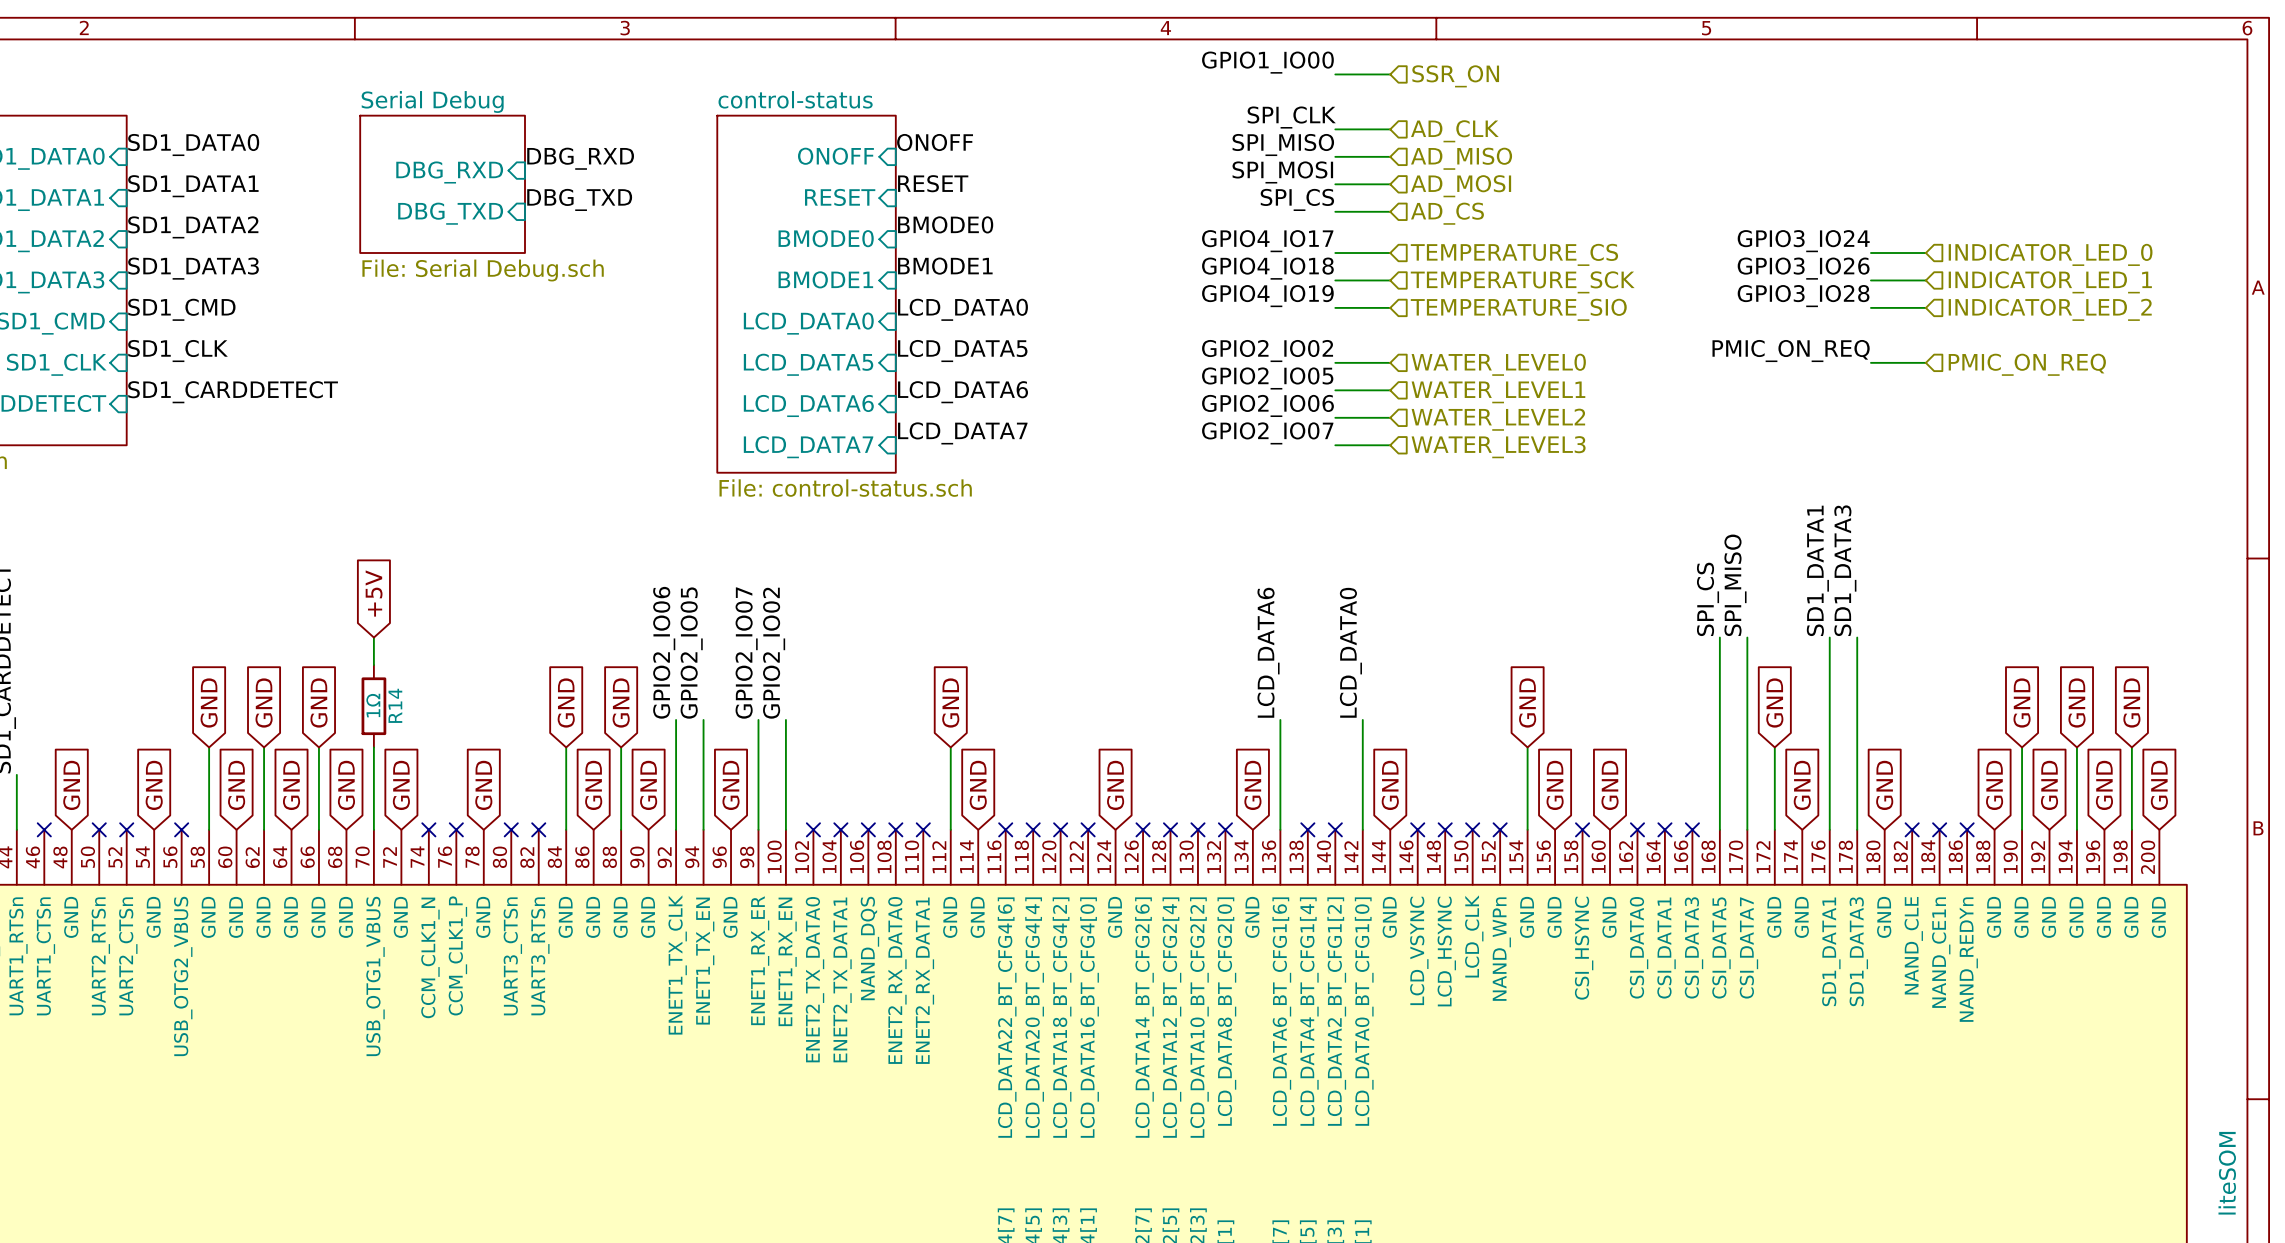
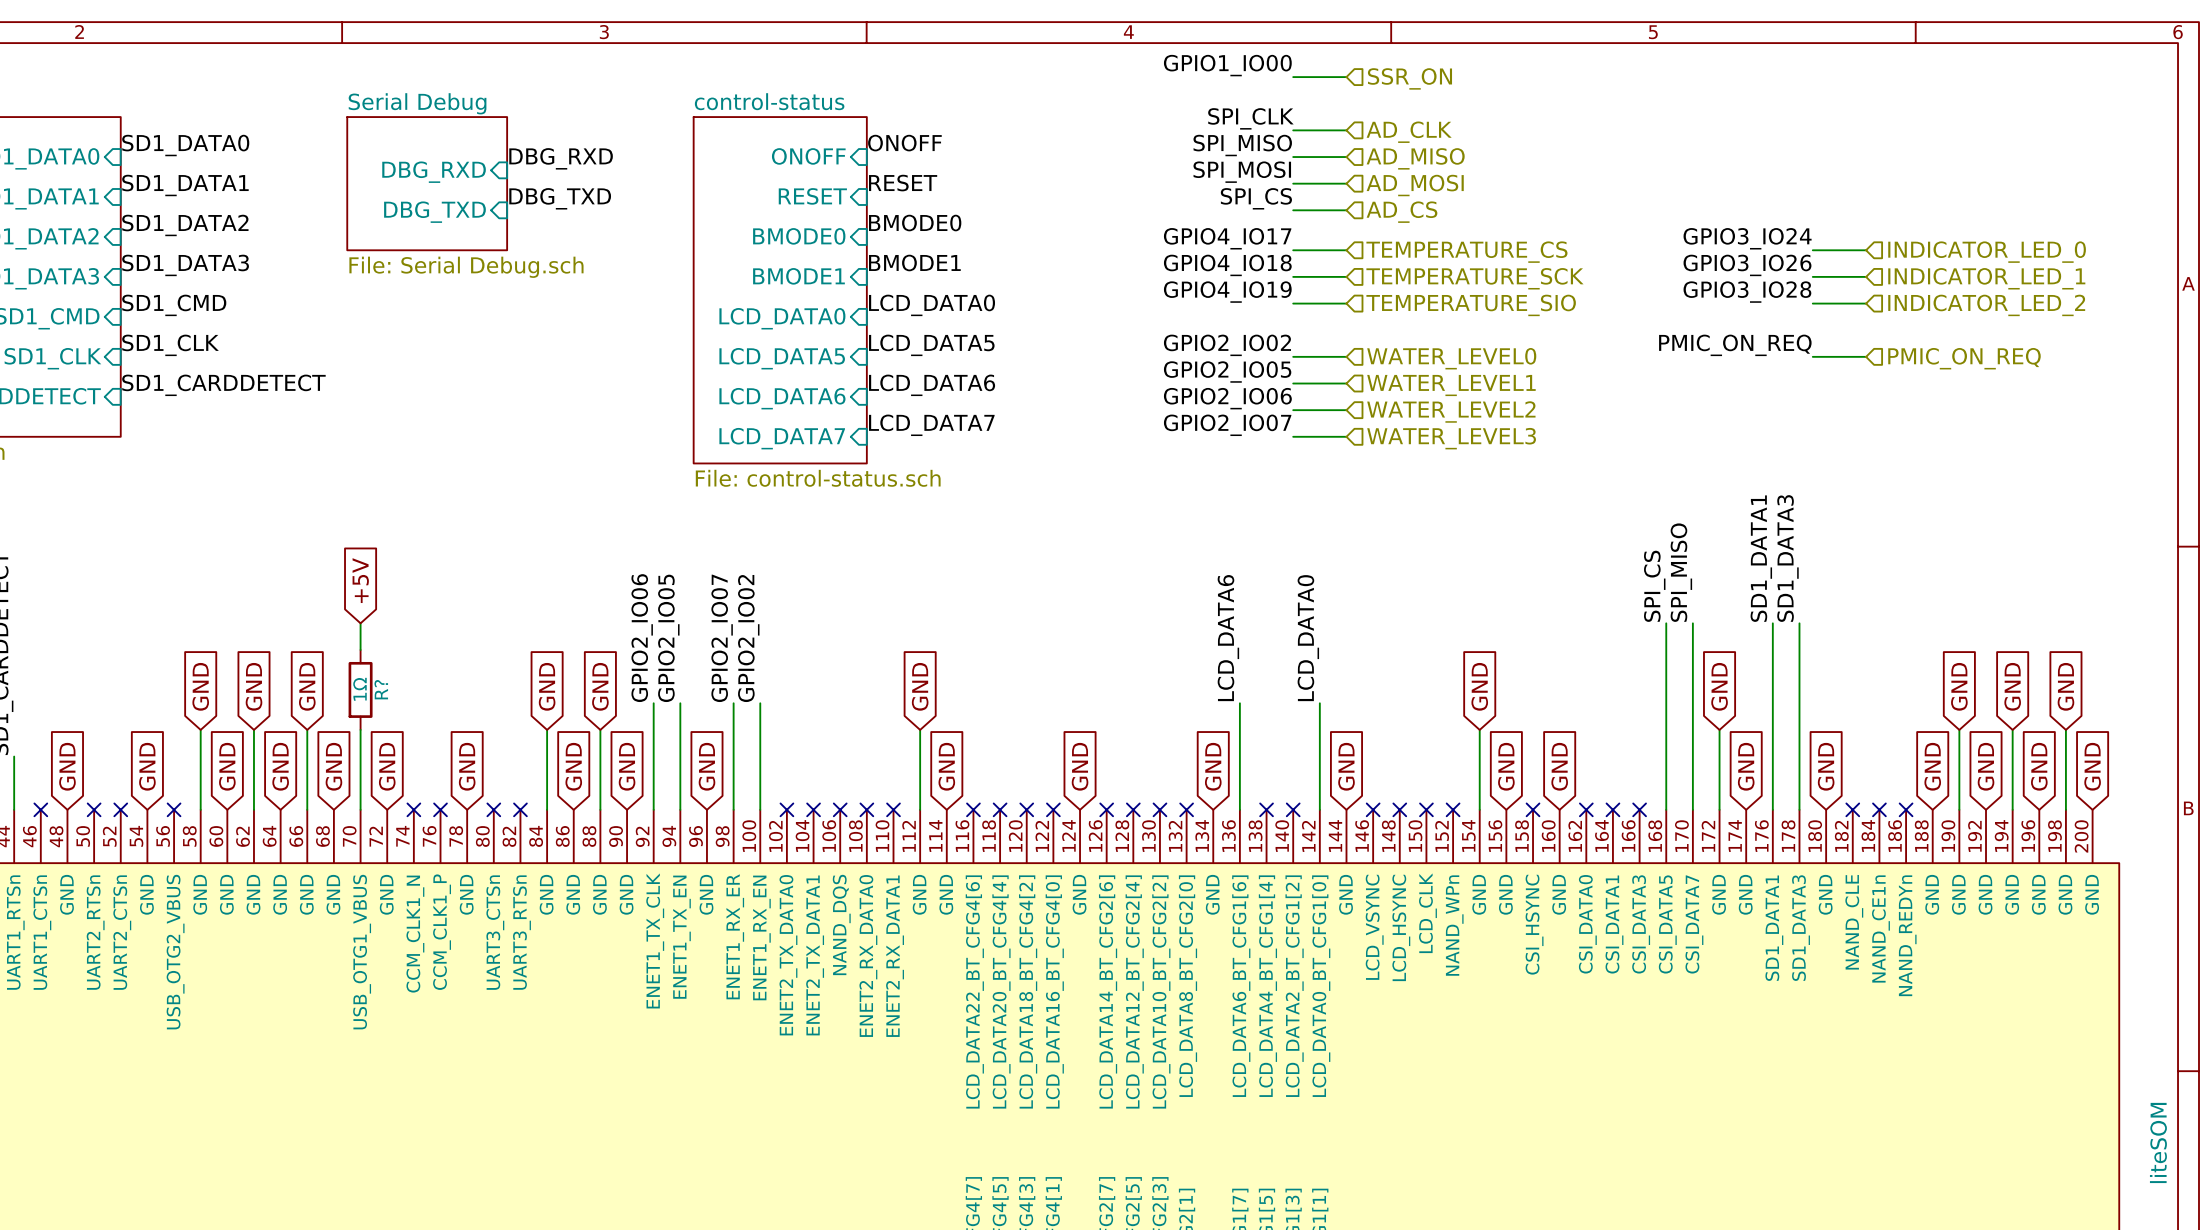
R14 name: R14 (395, 705) -> R? (381, 689)

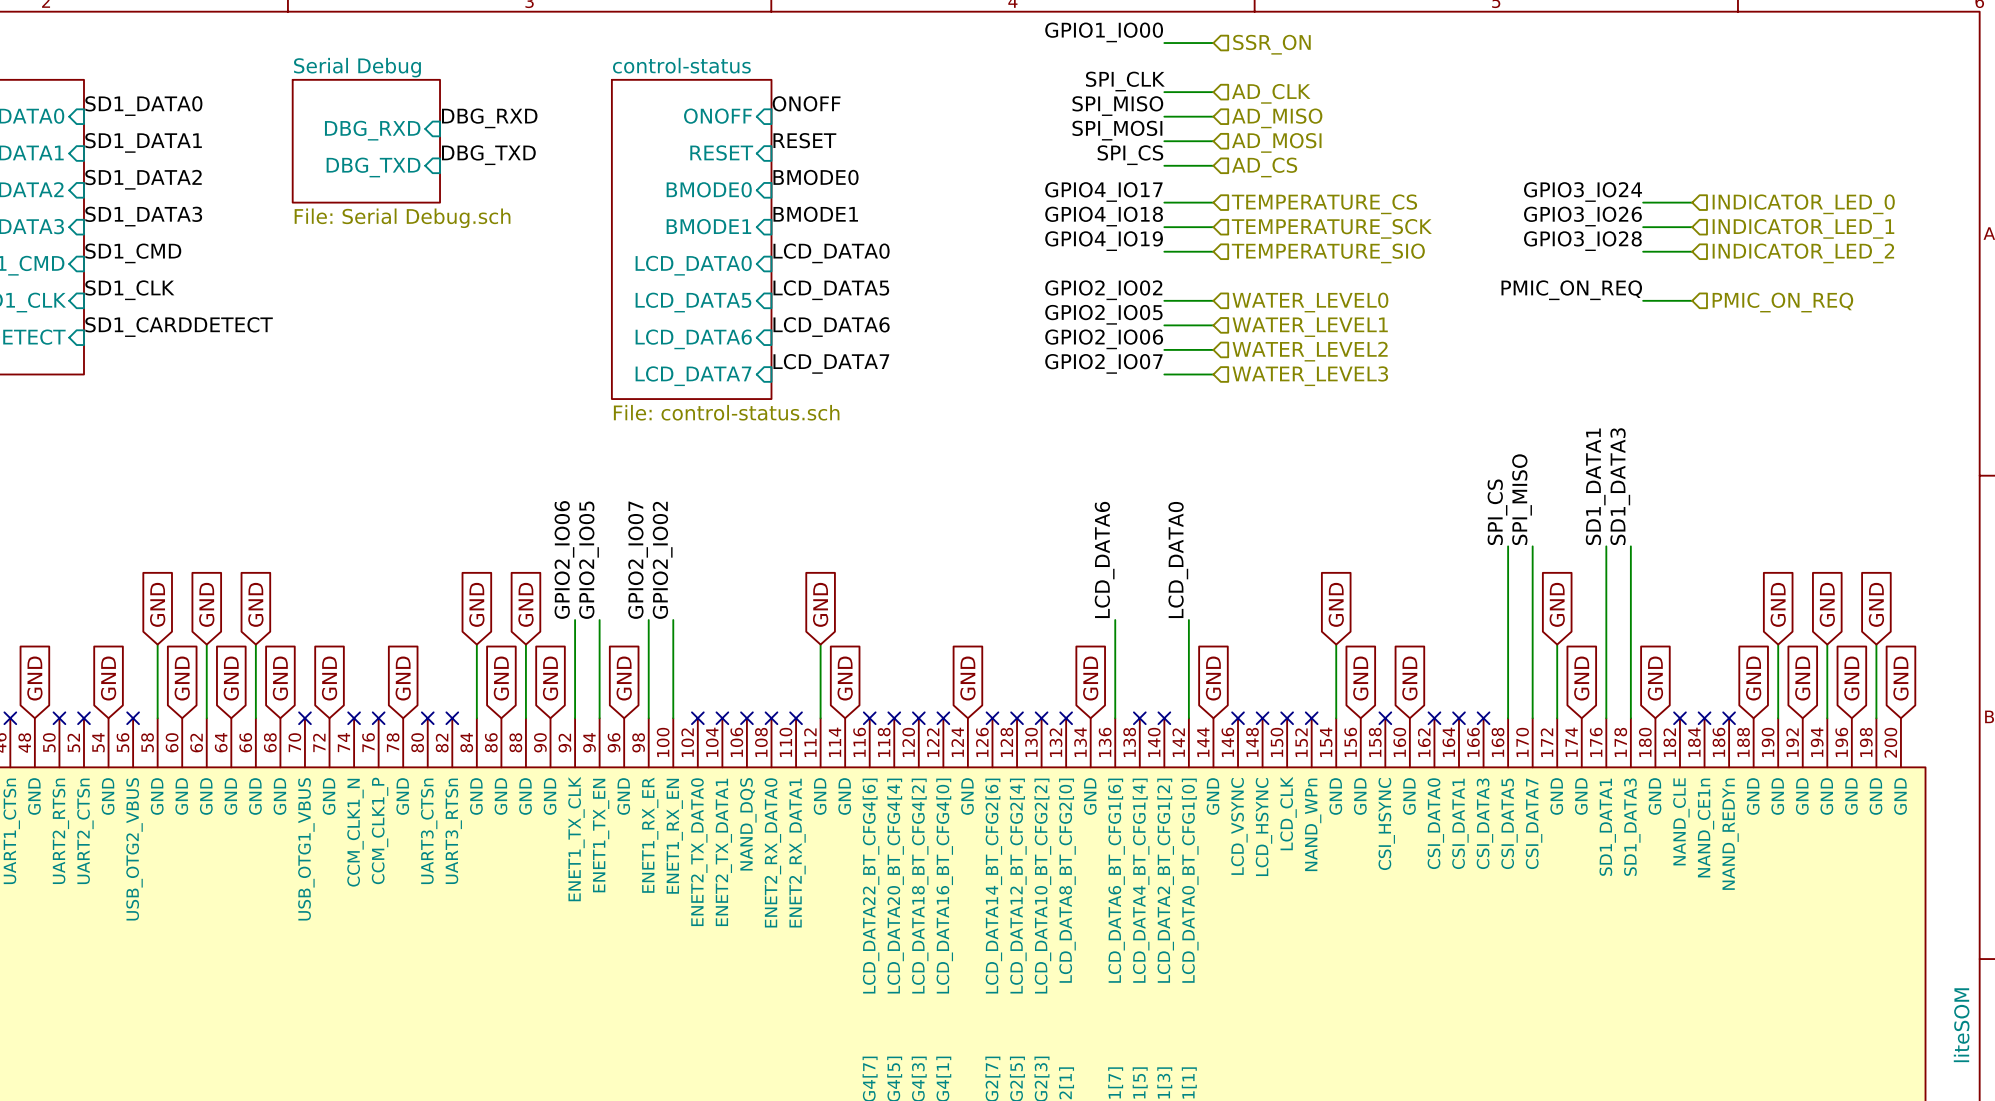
global label: +5V (360, 580) -> none
wire: (360, 623) (360, 649) -> none
R?: 1Ω (360, 689) -> none
wire: (360, 729) (360, 809) -> none
no-connect mark: none -> (304, 718)

